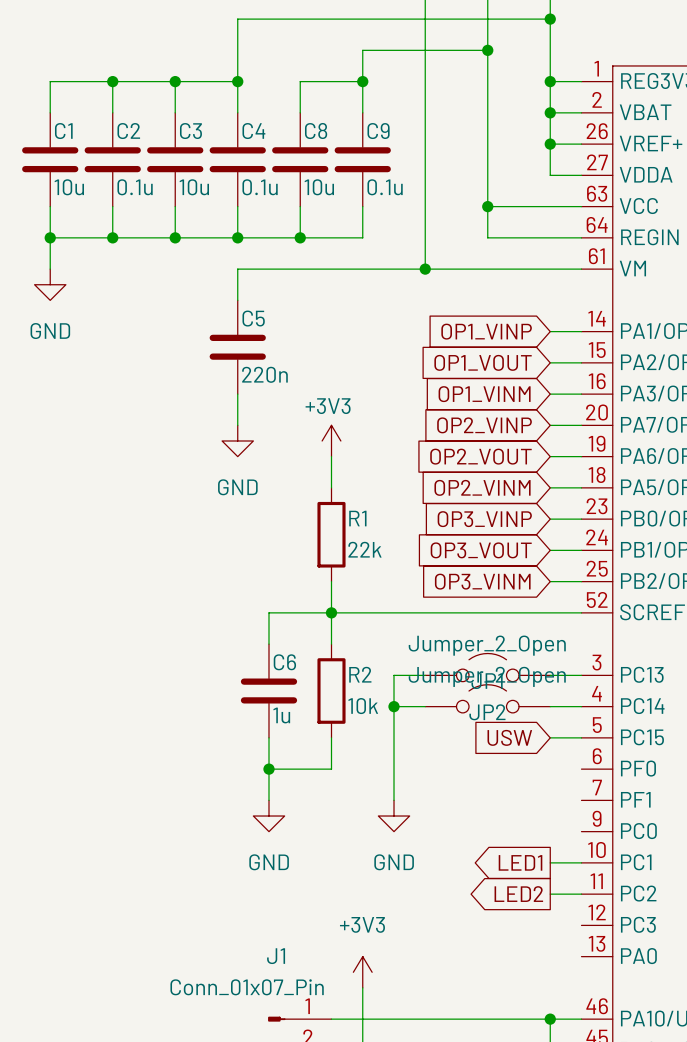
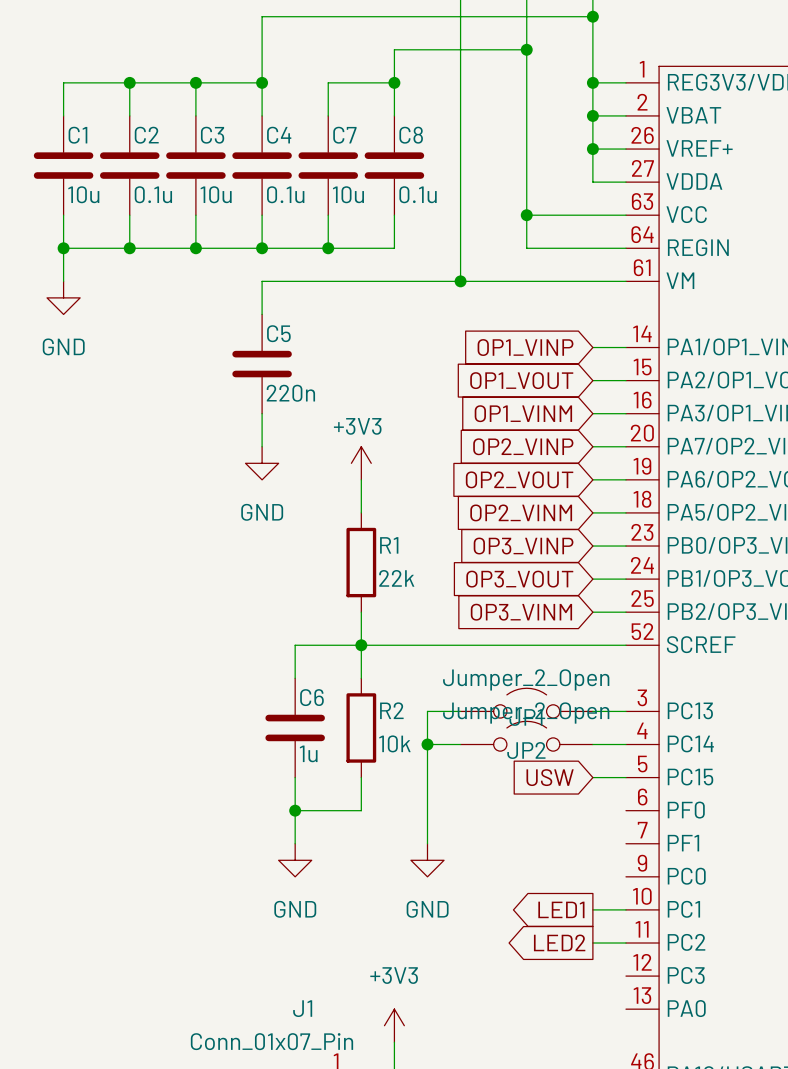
C8 name: C8 (316, 131) -> C7 (344, 135)
C9 name: C9 (378, 131) -> C8 (411, 135)

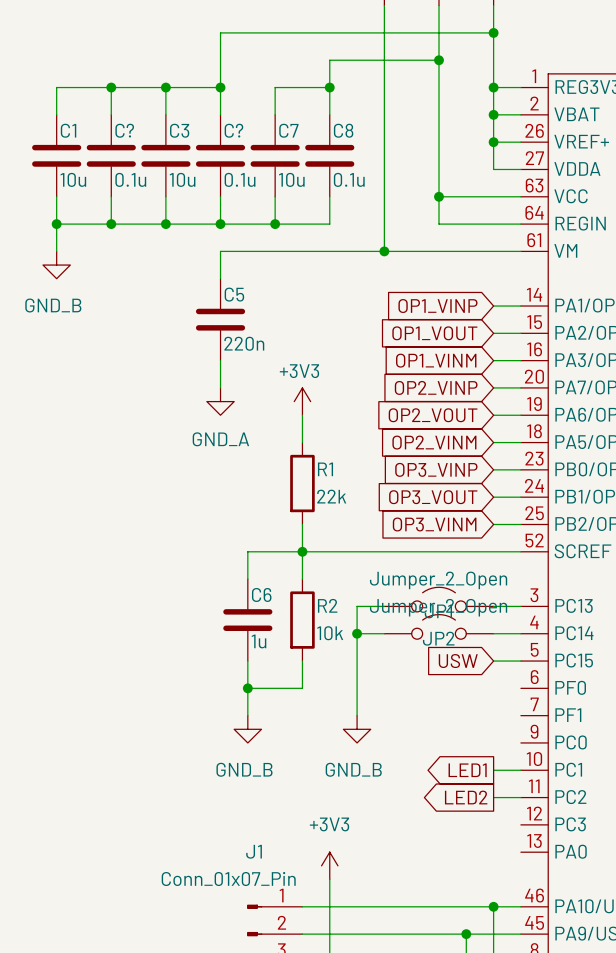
C2 name: C2 (146, 135) -> C? (124, 130)
C4 name: C4 (279, 135) -> C? (233, 130)
power symbol: GND (63, 297) -> GND_B (56, 265)
power symbol: GND (262, 463) -> GND_A (220, 401)
power symbol: GND (295, 860) -> GND_B (247, 729)
power symbol: GND (427, 860) -> GND_B (357, 729)

